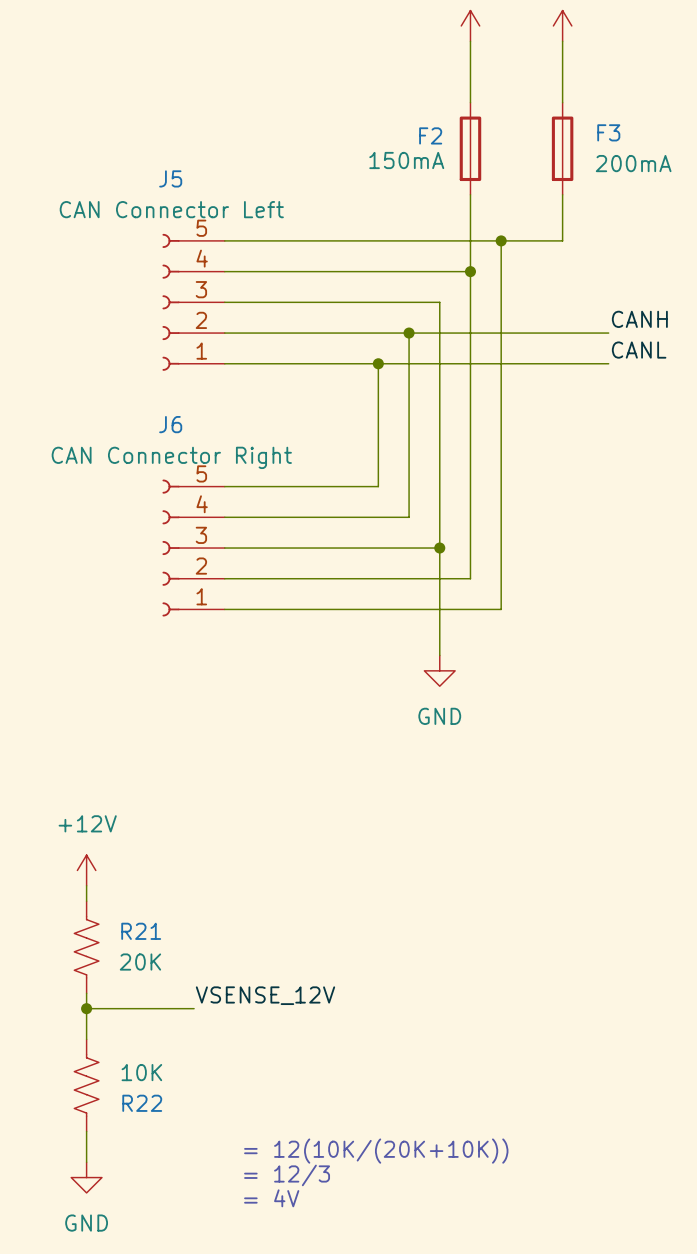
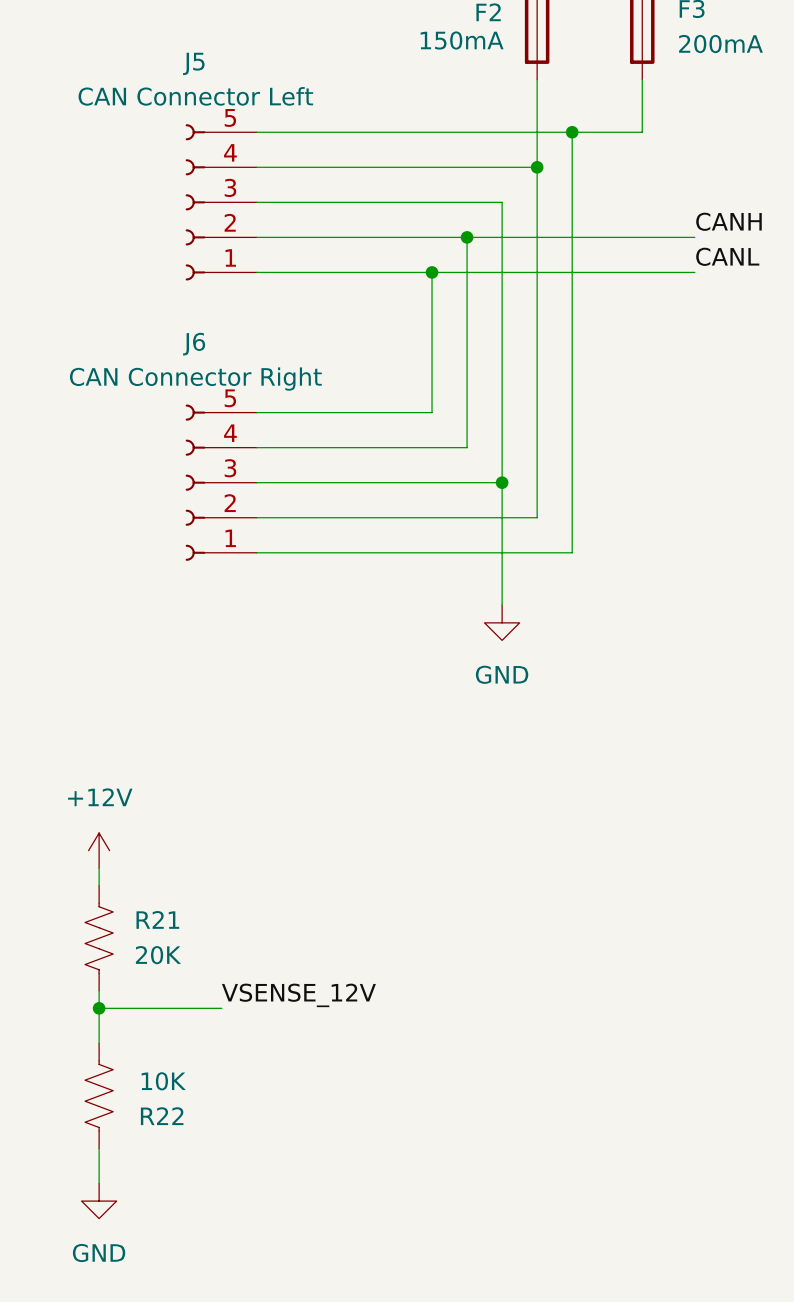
text: = 12(10K/(20K+10K)) (376, 1151) -> none
text: = 12/3 (287, 1175) -> none
text: = 4V (271, 1198) -> none

